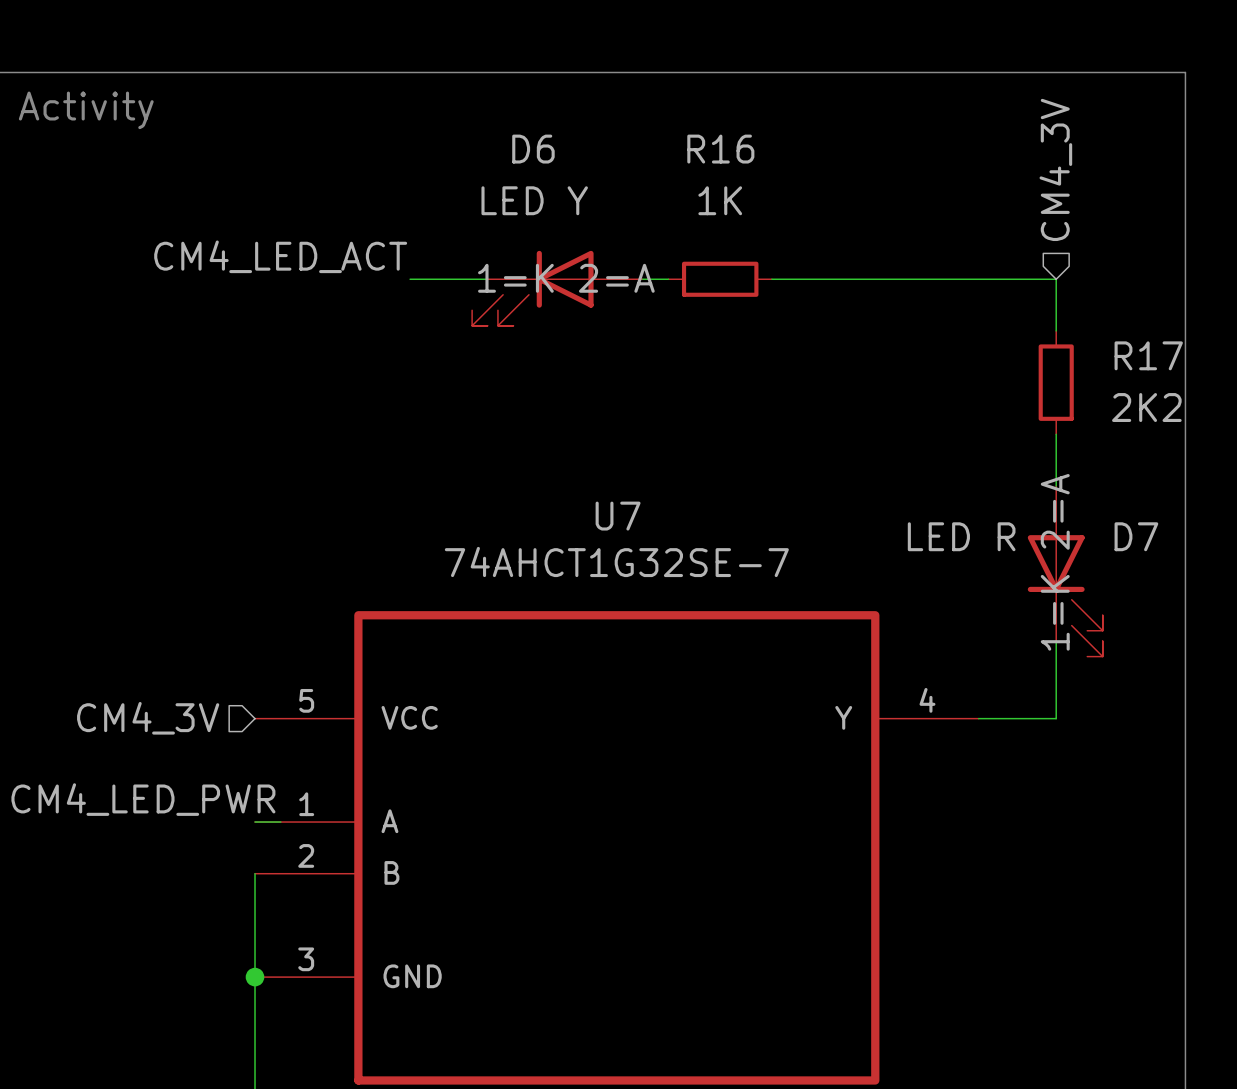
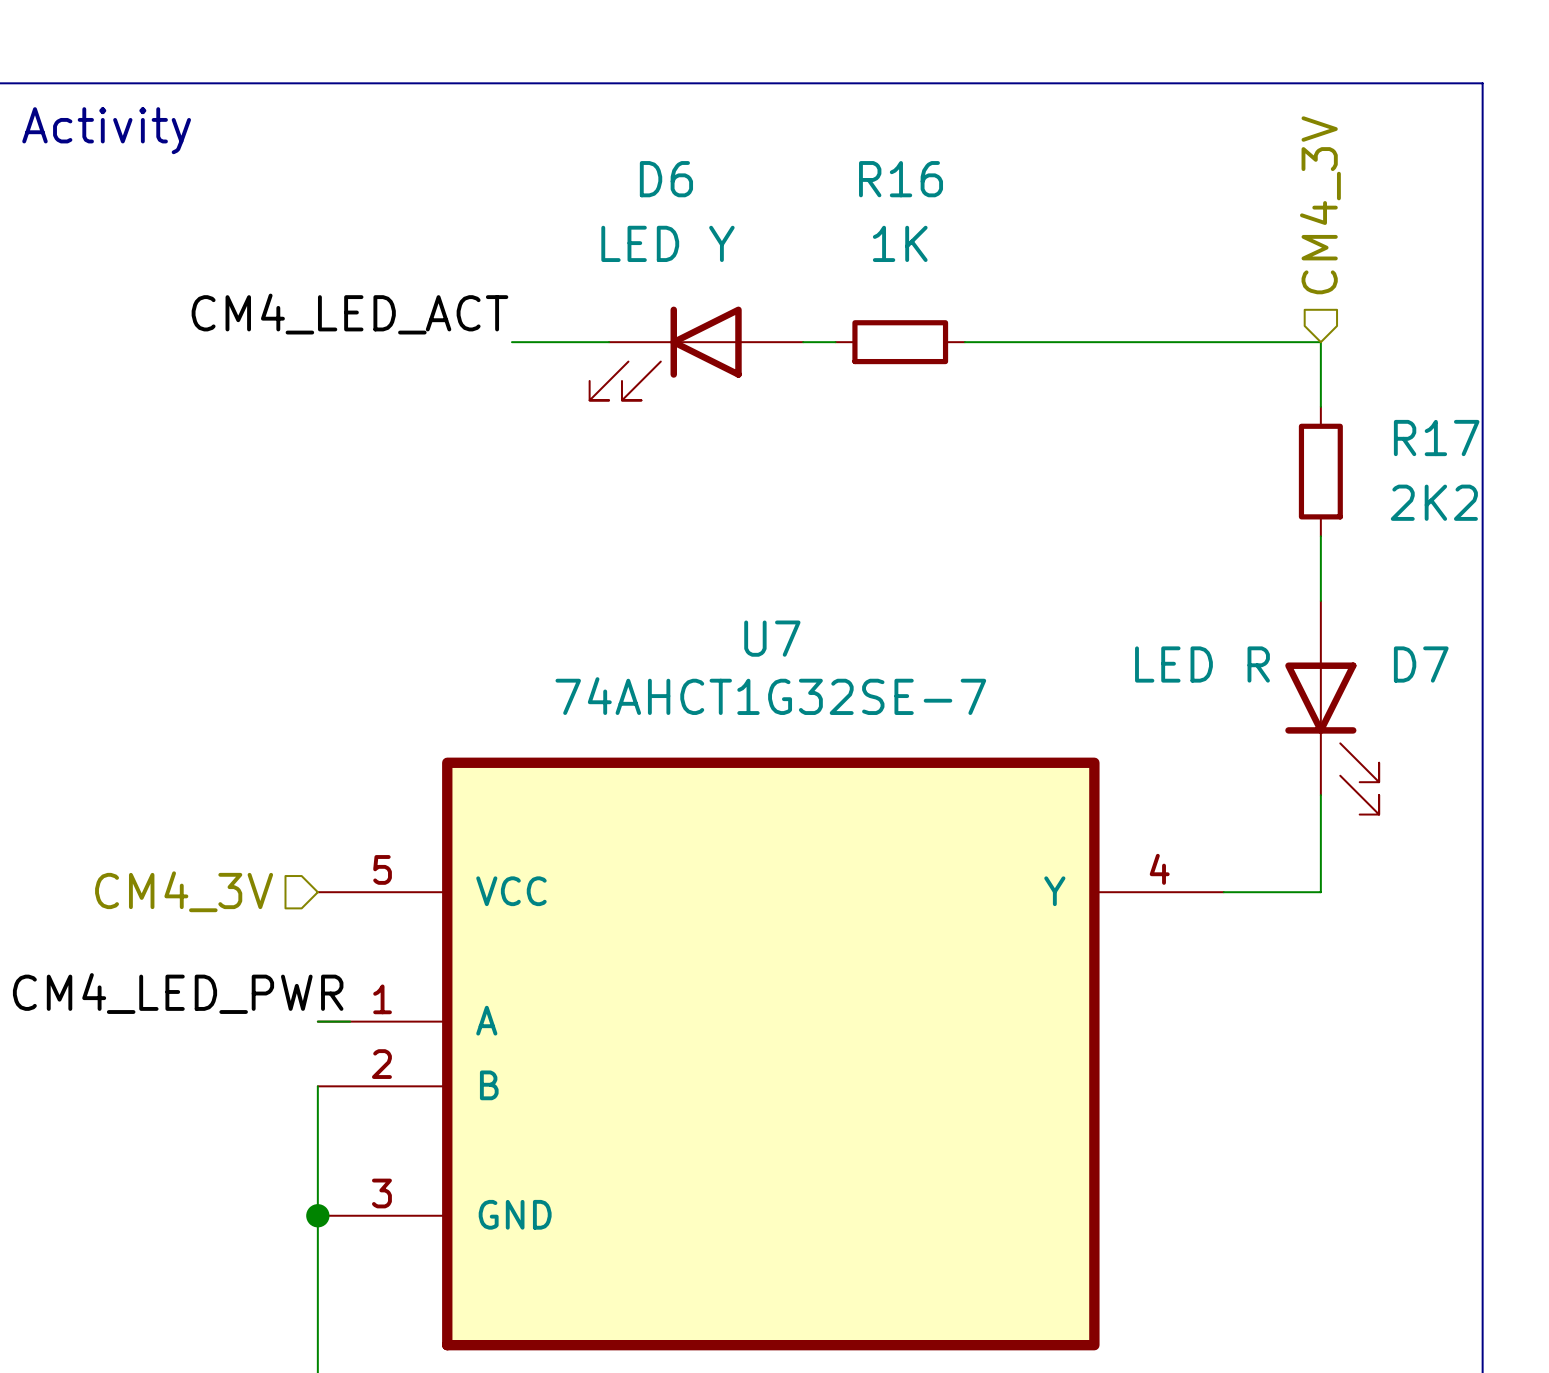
D6 text: 1=K 2=A (566, 278) -> none
D7 text: 1=K 2=A (1055, 562) -> none

